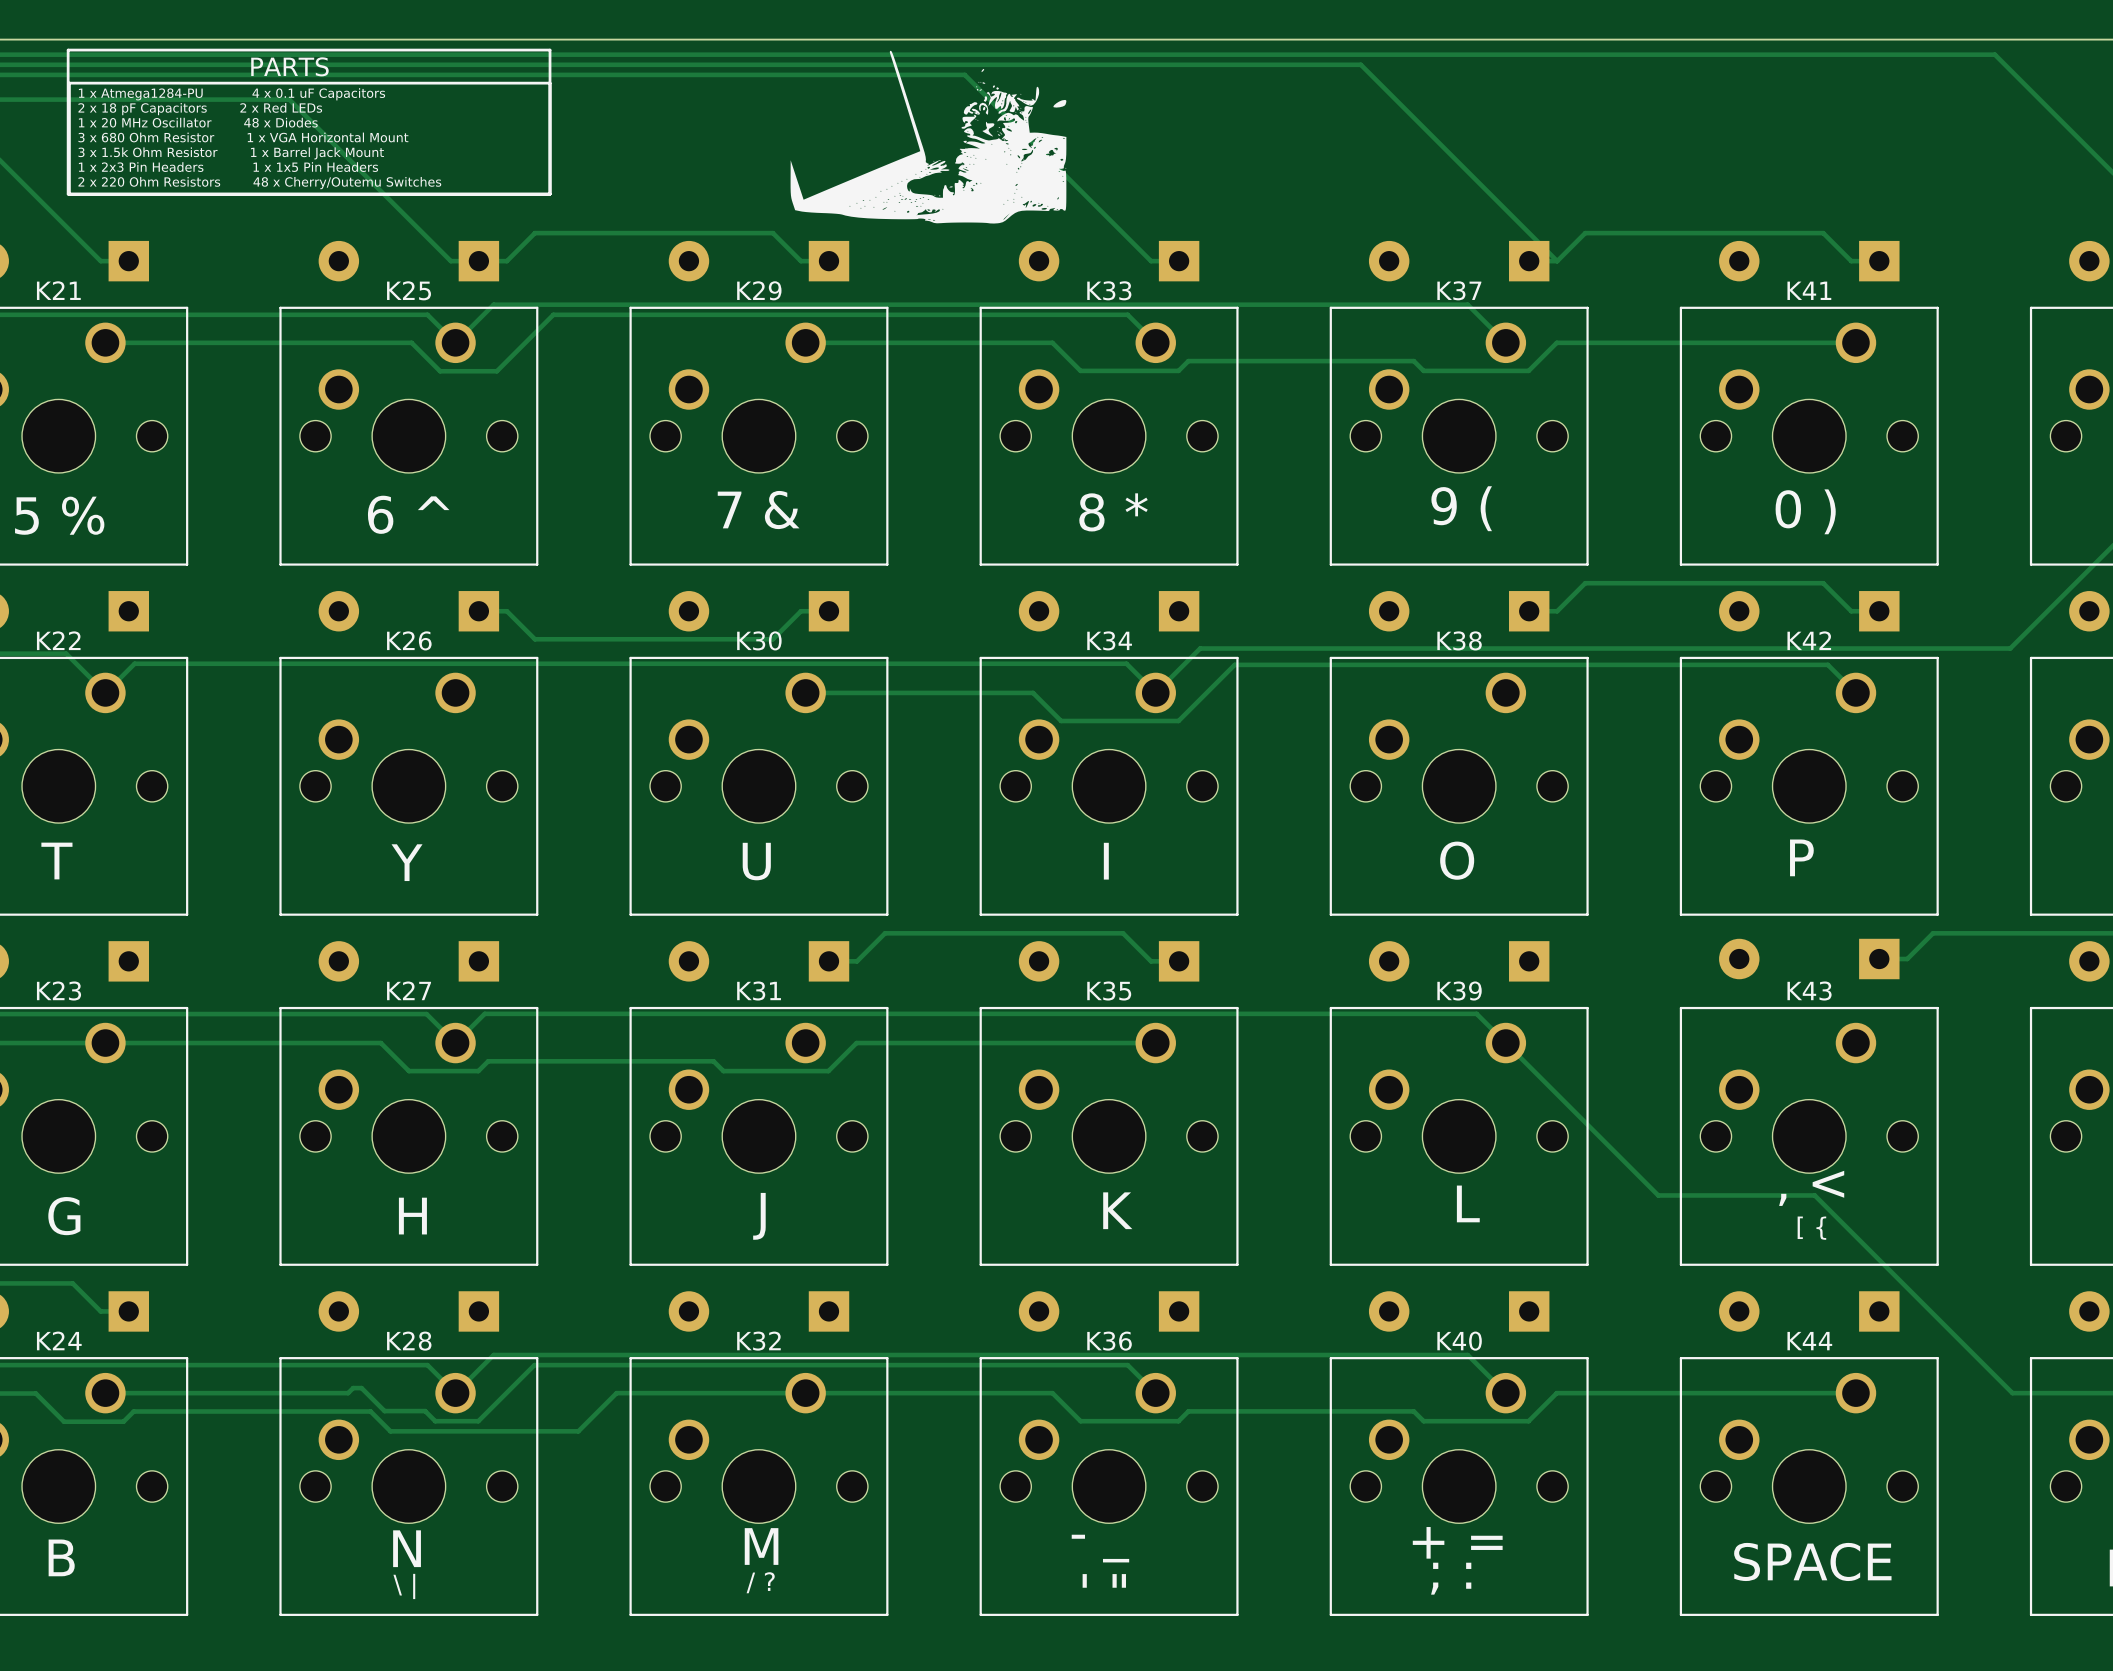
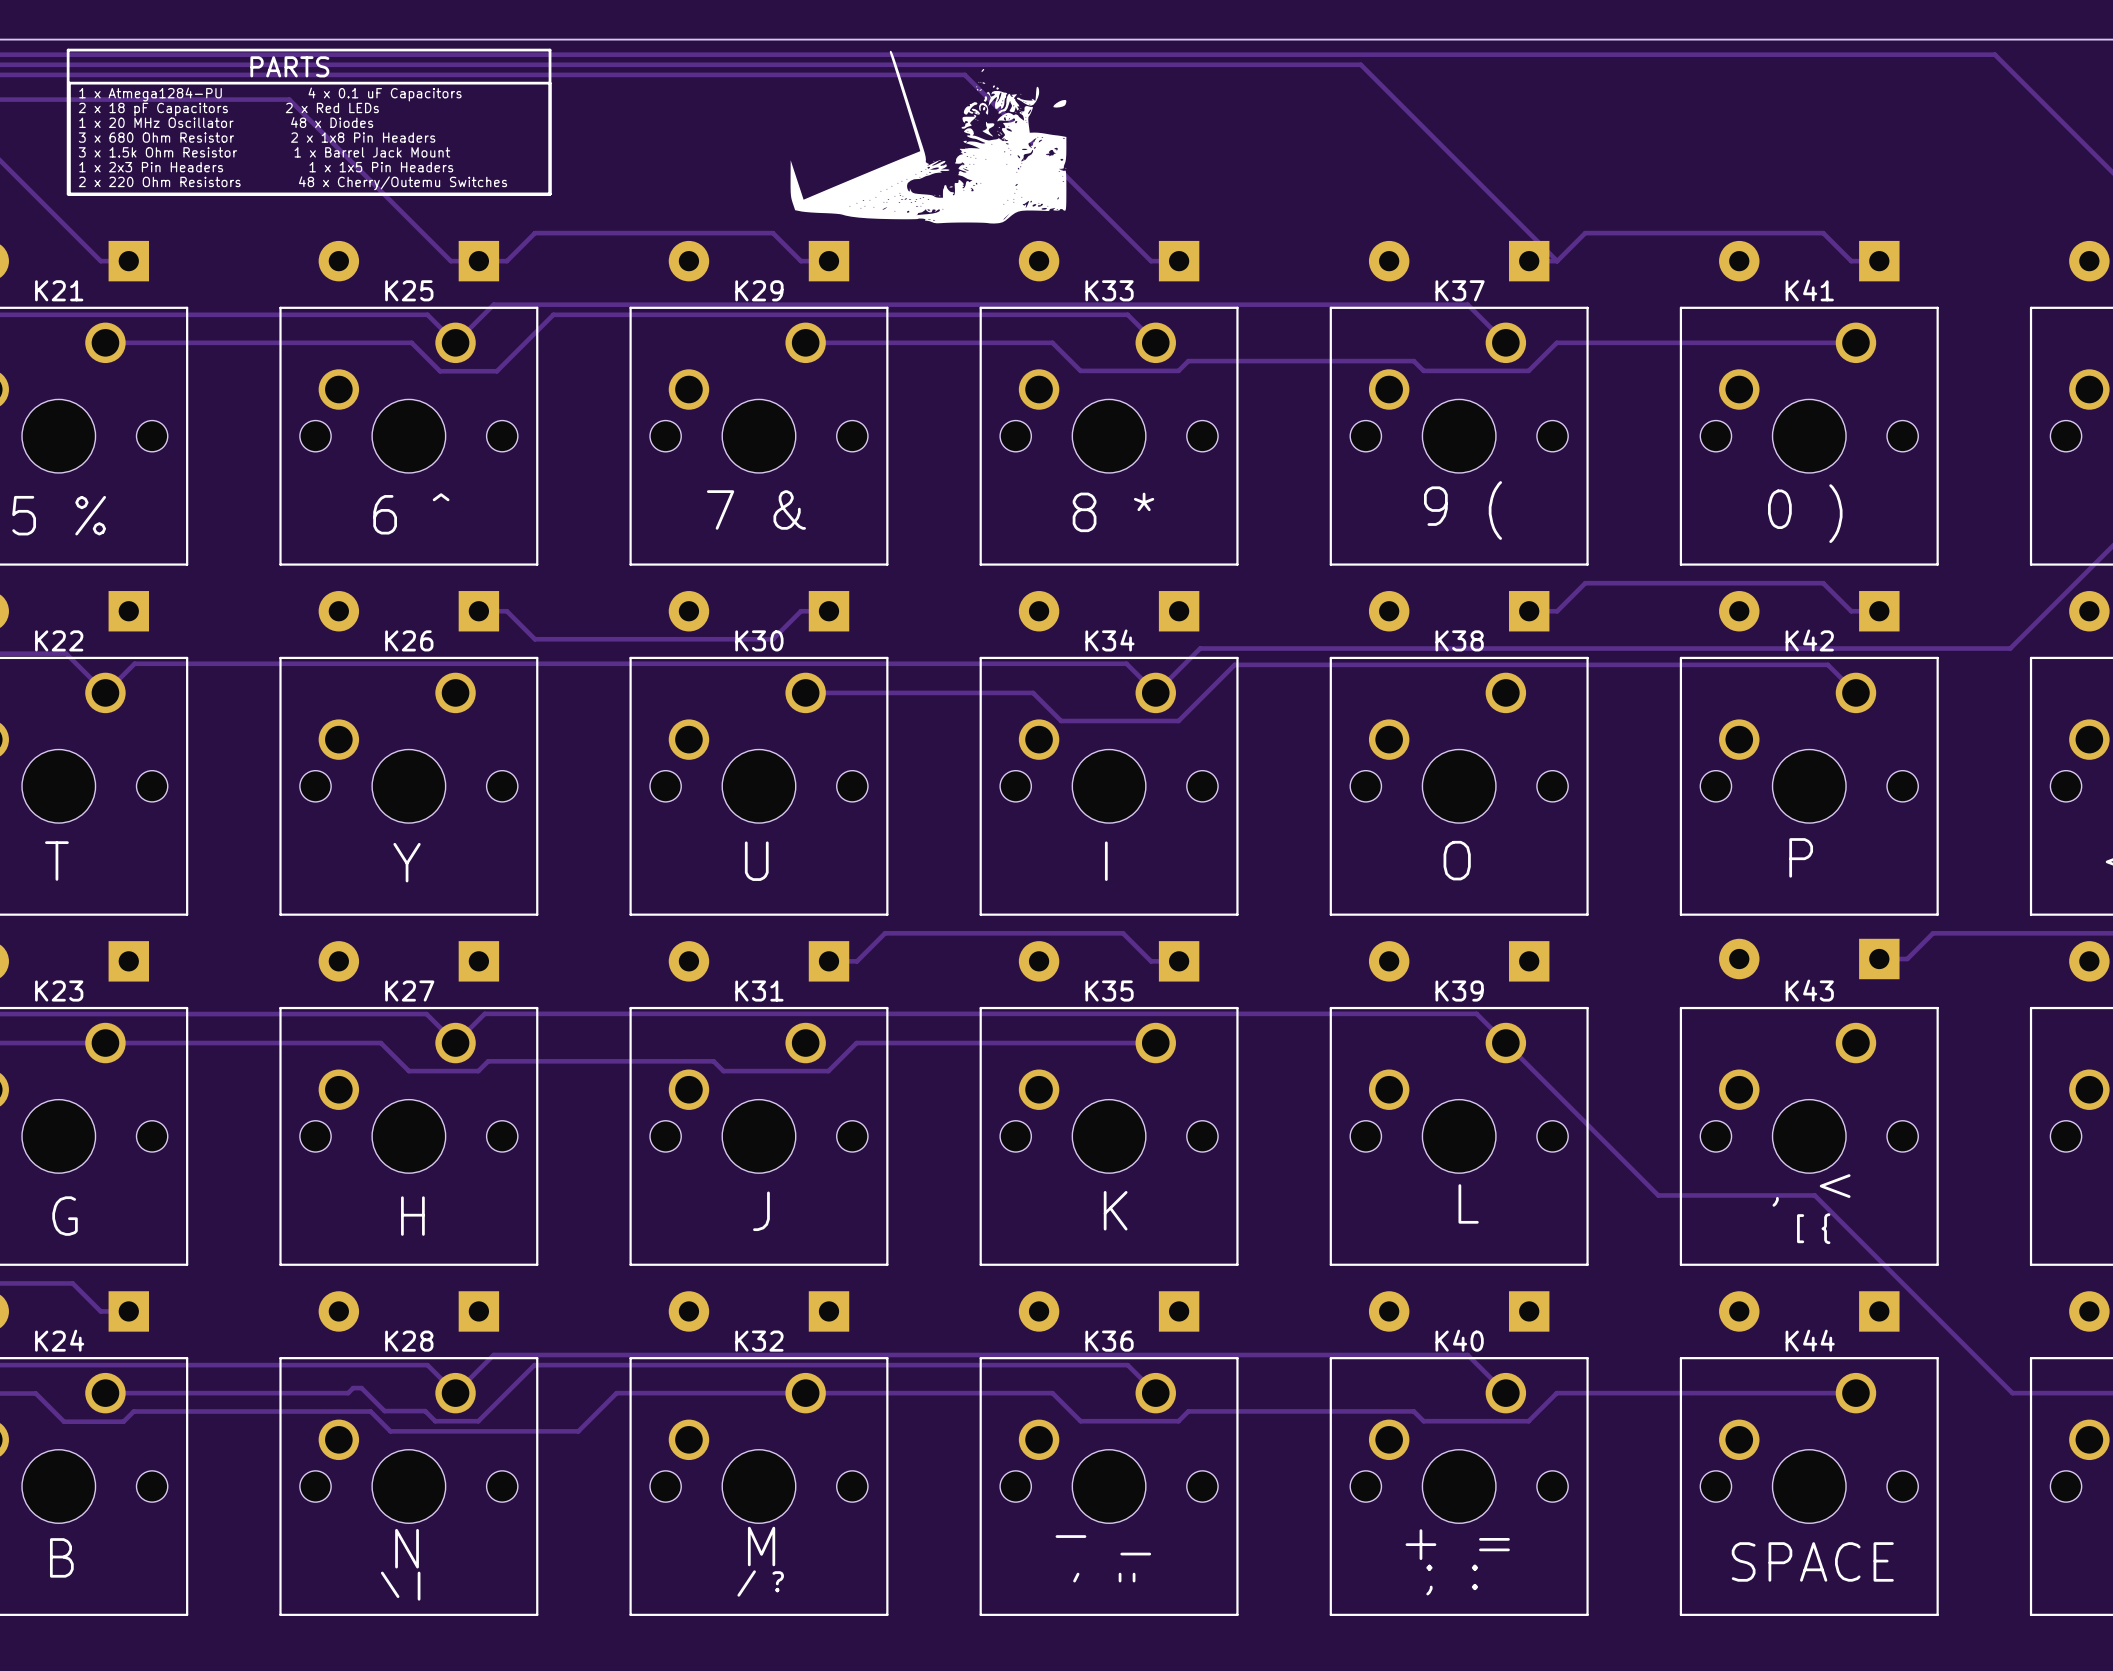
text: 3 x 680 Ohm Resistor 1 x VGA Horizontal Mount (243, 137) -> 3 x 680 Ohm Resistor 2 x 1x8 Pin Headers (257, 137)

